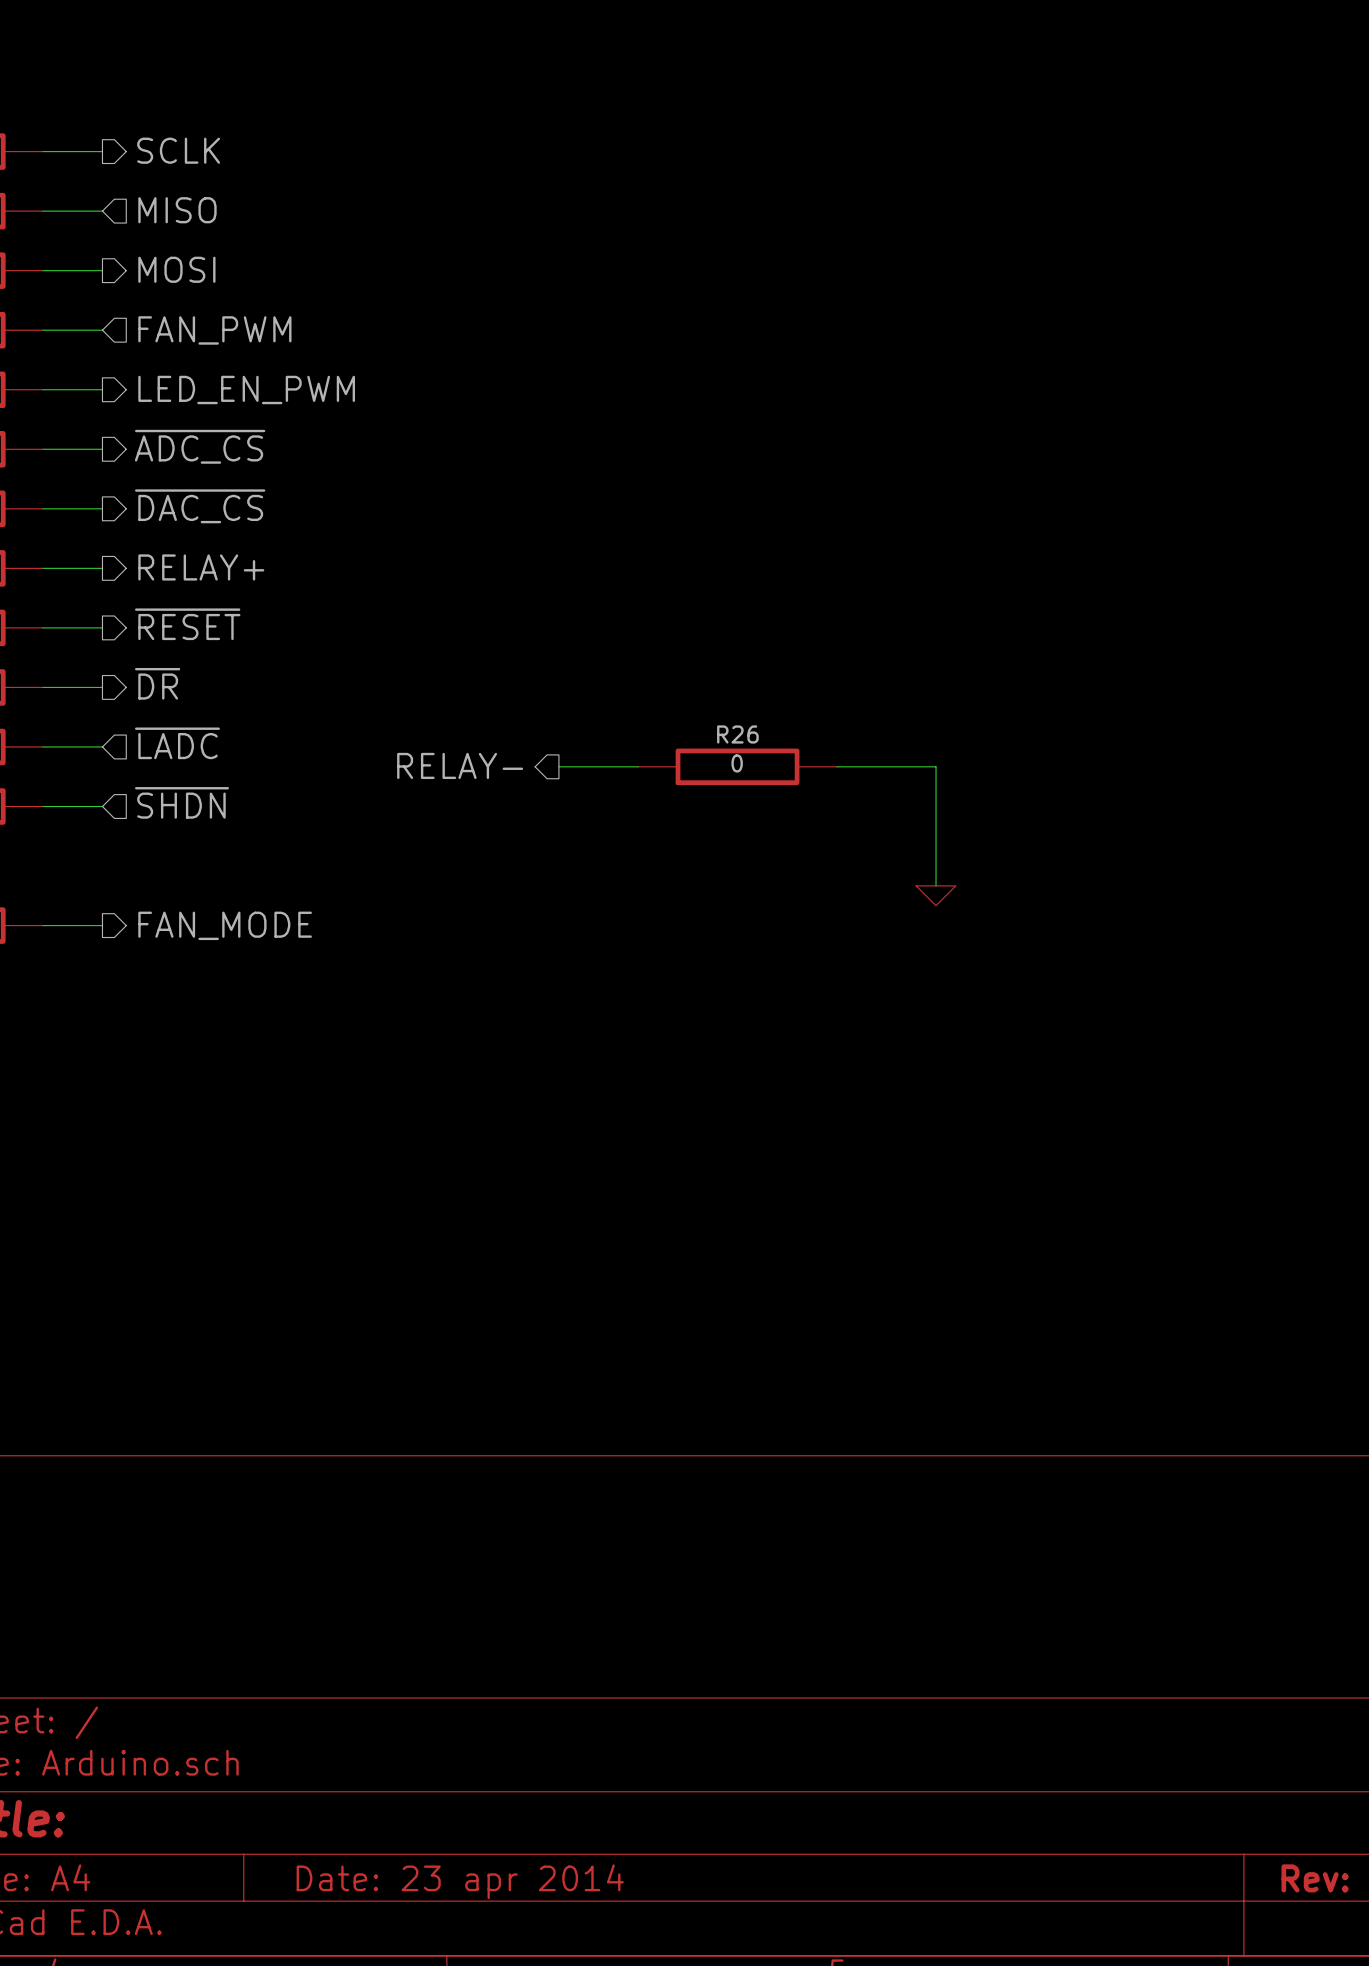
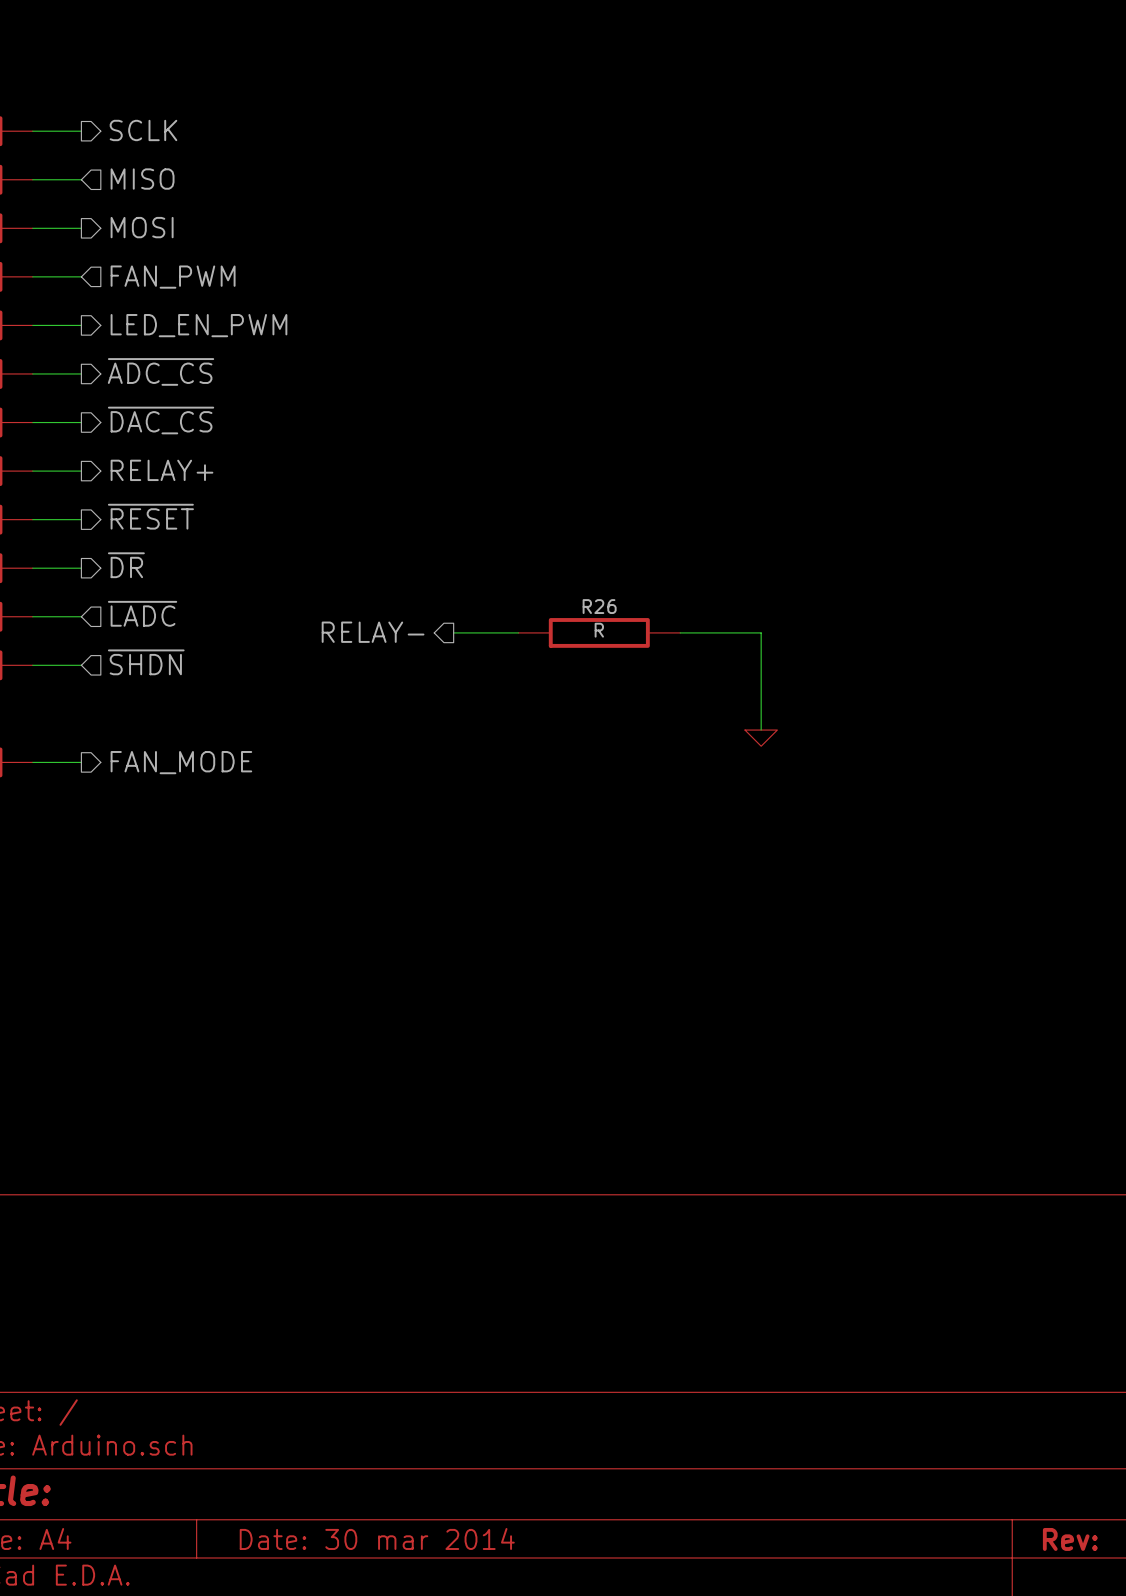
R26 value: 0 (737, 763) -> R (599, 630)
title block: Date: 23 apr 2014 (460, 1881) -> Date: 30 mar 2014 (377, 1538)

